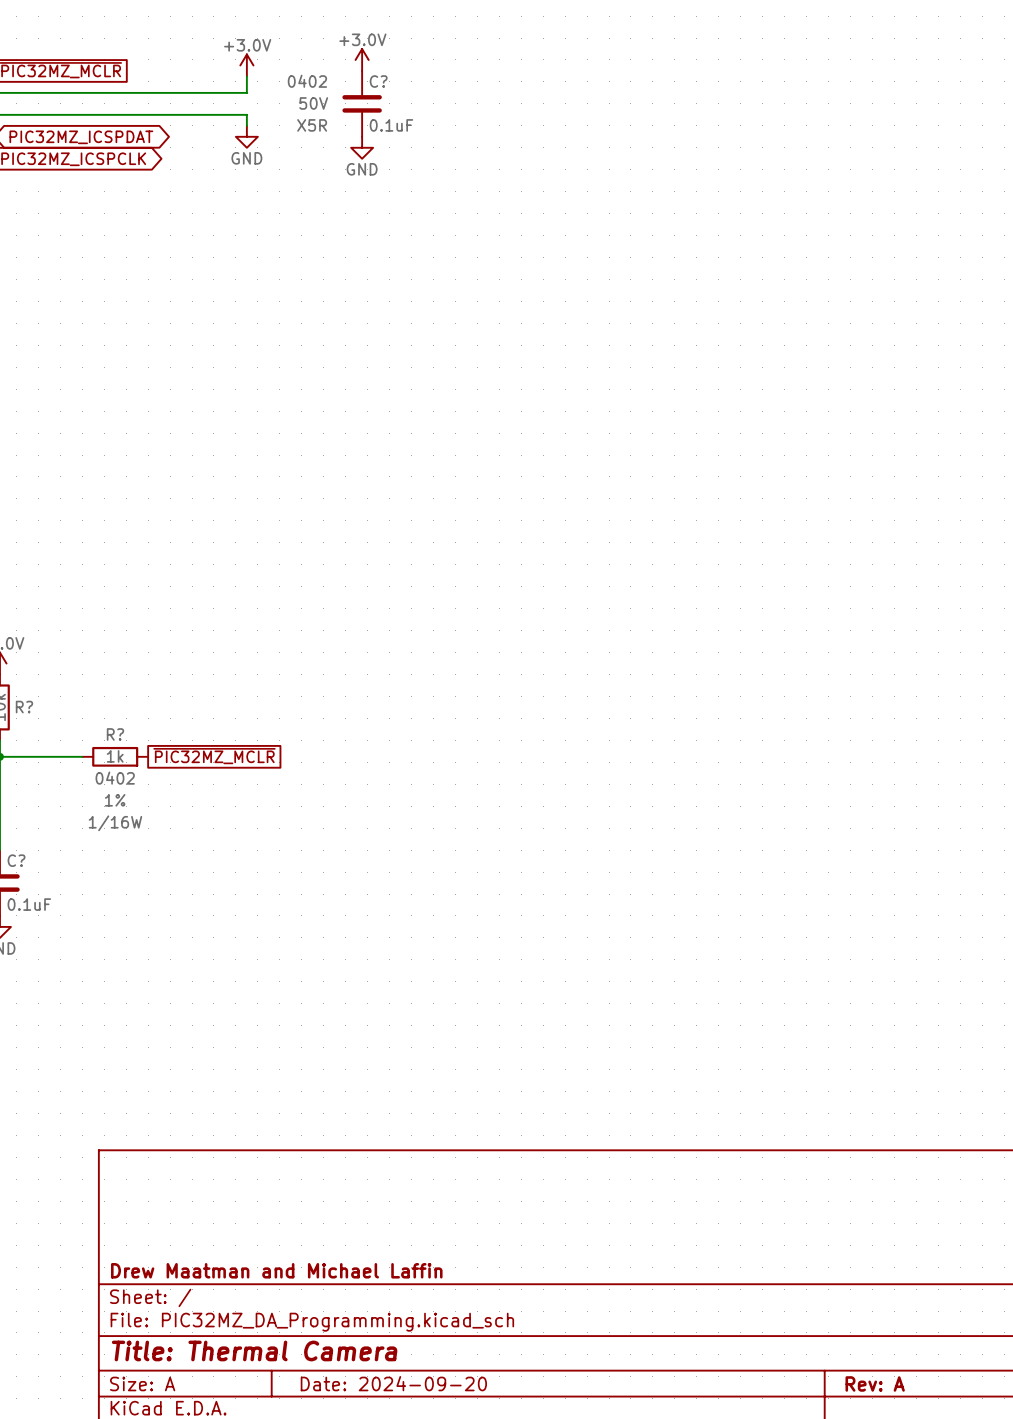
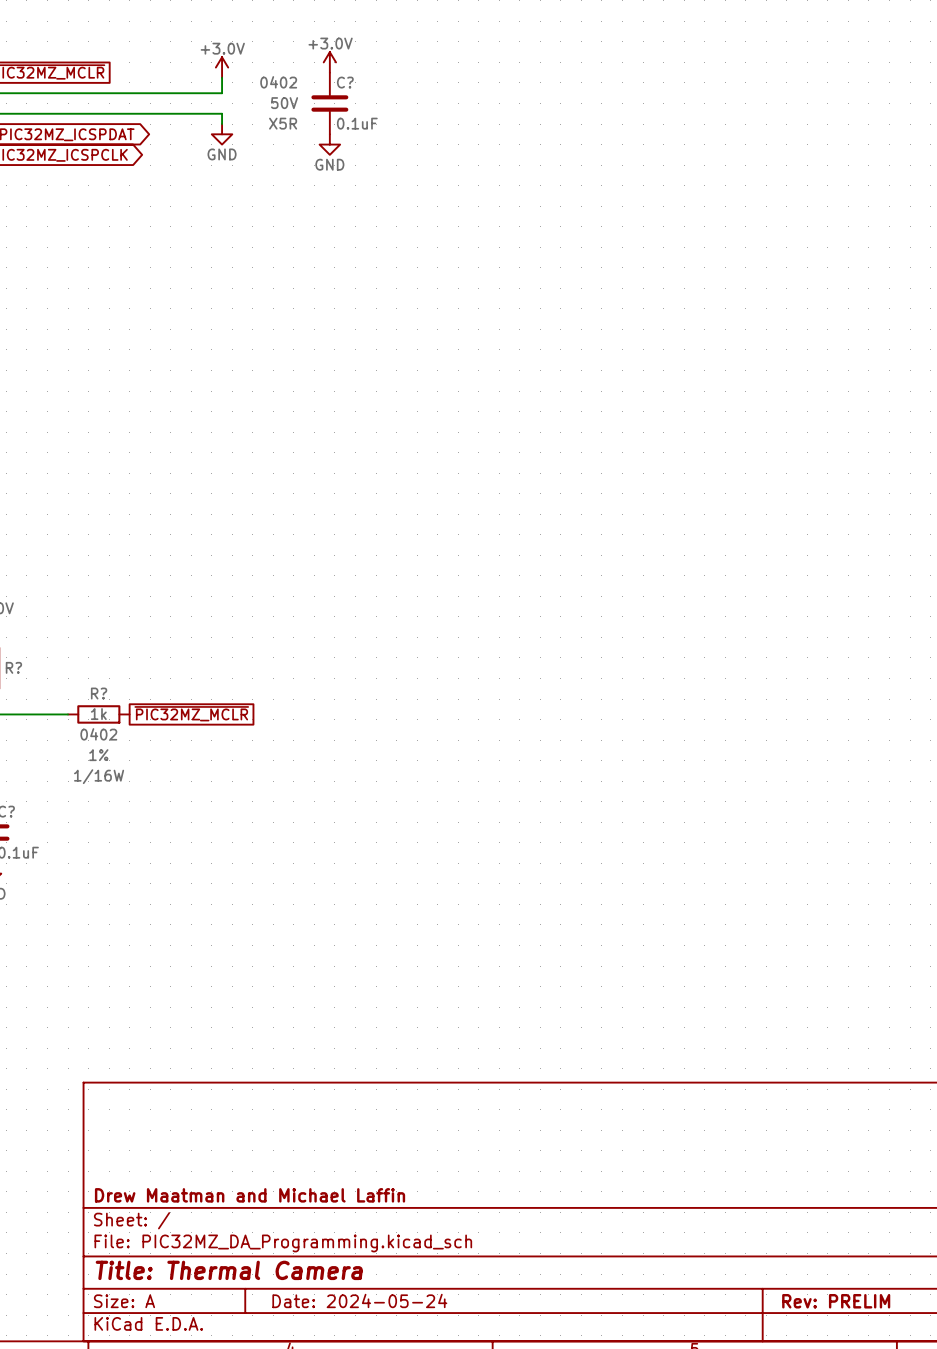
title block: Date: 2024-09-20 (393, 1383) -> Date: 2024-05-24 (359, 1300)
title block: Rev: A (875, 1383) -> Rev: PRELIM (836, 1301)

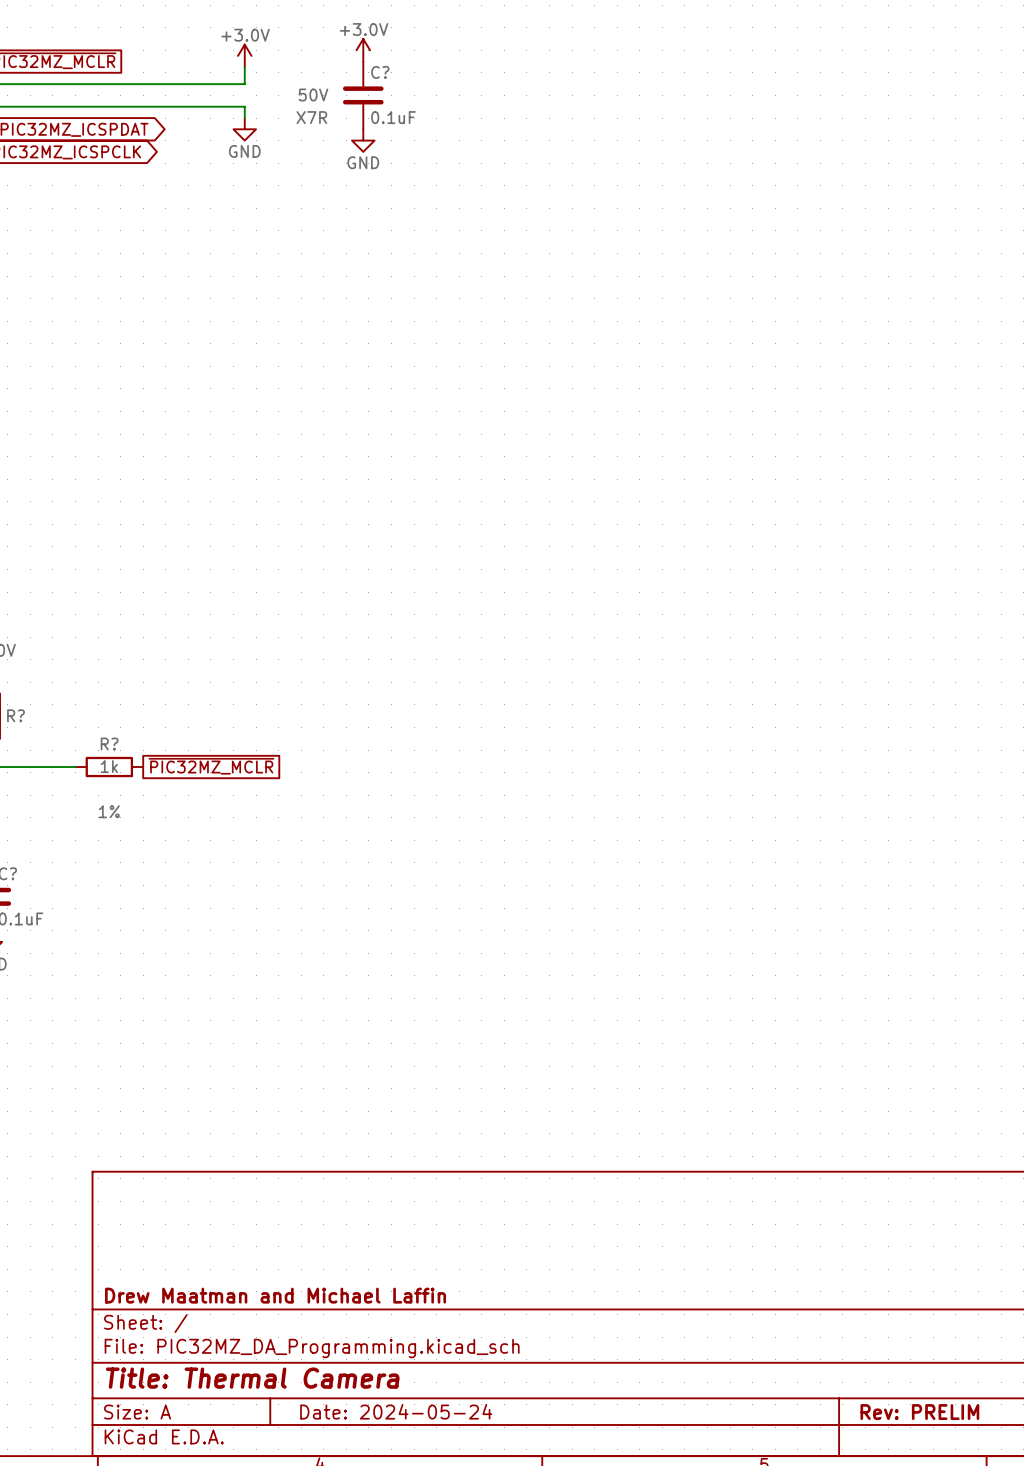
C? text: 0402 (278, 82) -> none
C? text: X5R (283, 123) -> X7R (311, 117)
R? text: 0402 (98, 734) -> none
R? text: 1/16W (99, 776) -> none

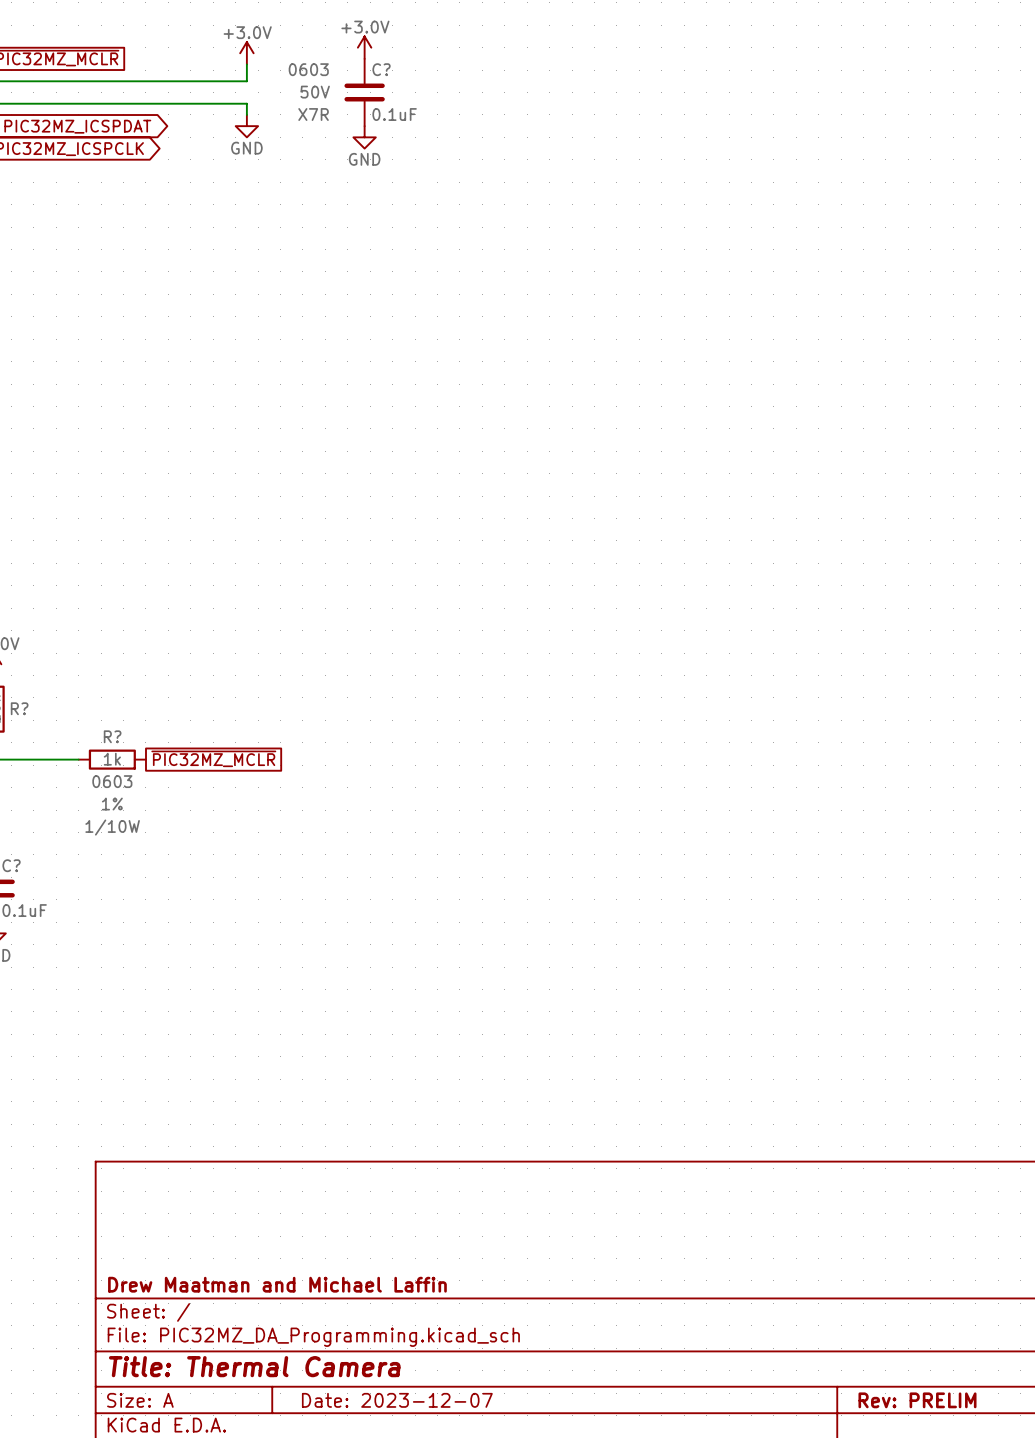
C? text: none -> 0603 (308, 69)
R? text: none -> 0603 (112, 781)
R? text: none -> 1/10W (112, 827)
title block: Date: 2024-05-24 (396, 1411) -> Date: 2023-12-07 (397, 1400)

